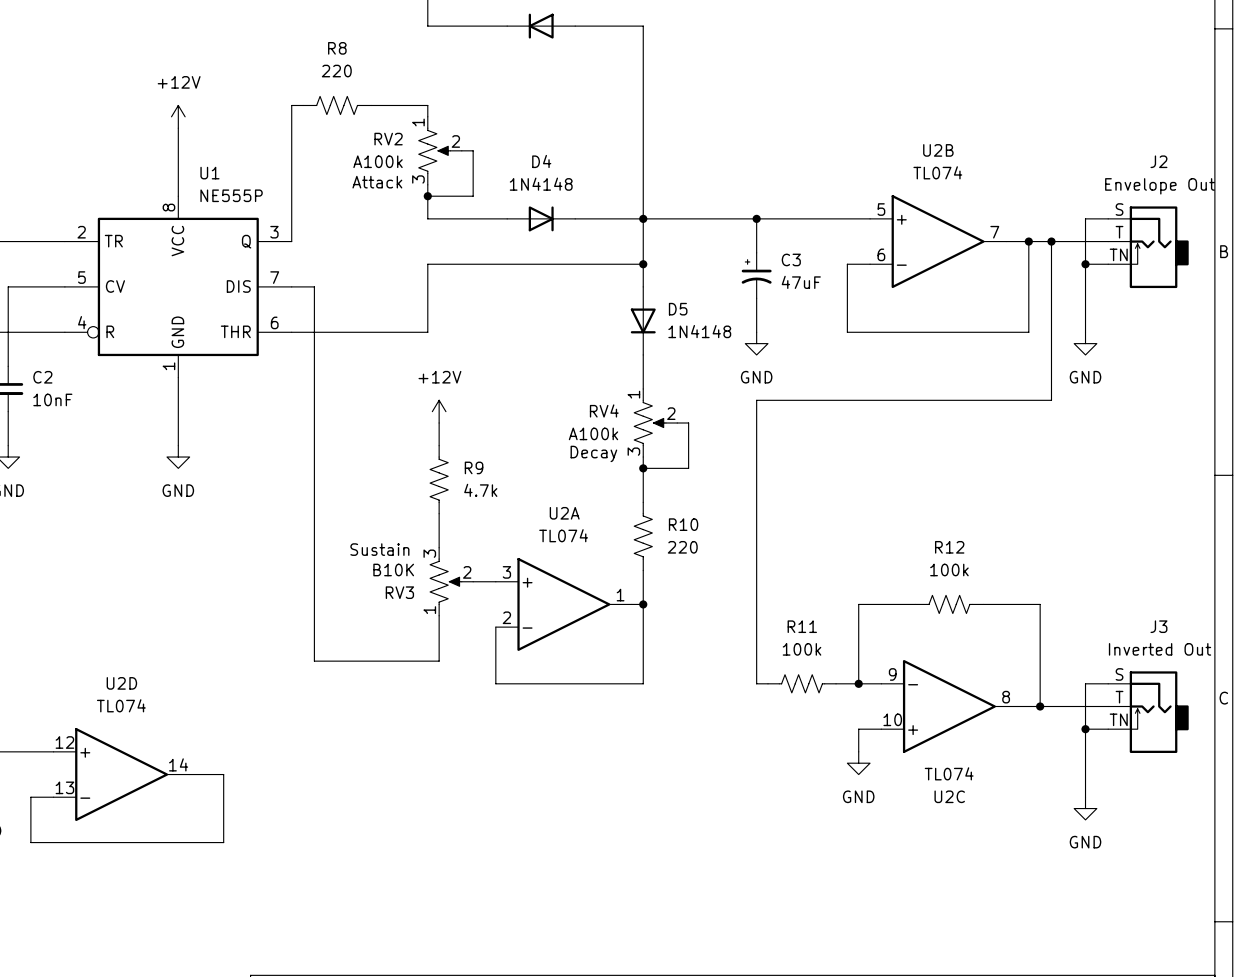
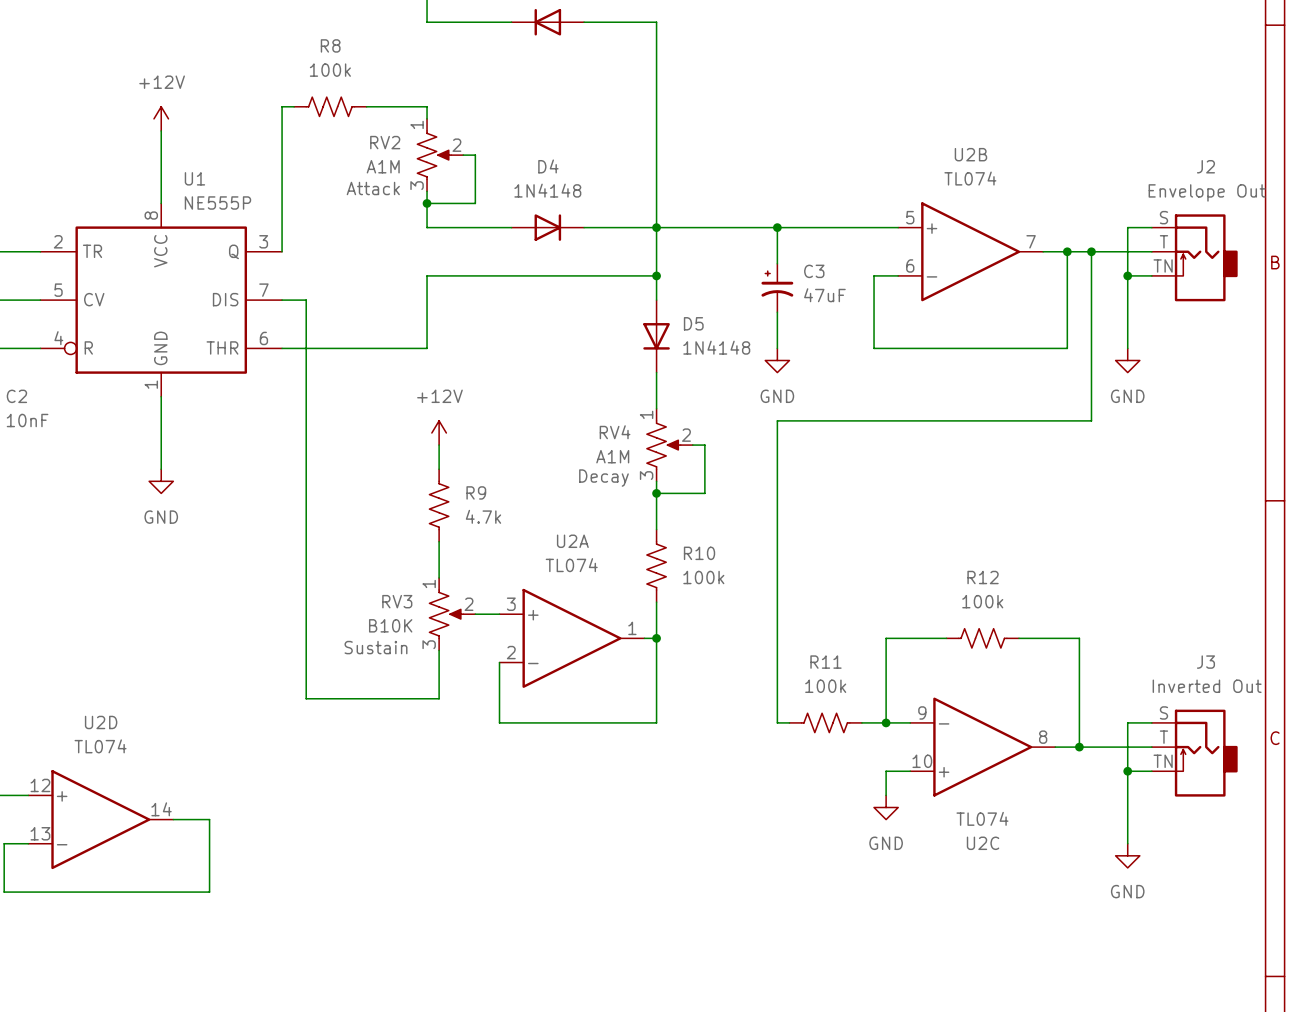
R8 value: 220 (336, 71) -> 100k (330, 70)
RV2 value: A100k (378, 161) -> A1M (383, 166)
RV4 value: A100k (593, 433) -> A1M (612, 456)
R10 value: 220 (682, 547) -> 100k (703, 577)
RV3 flip: as is (445, 581) -> up-down (446, 614)

